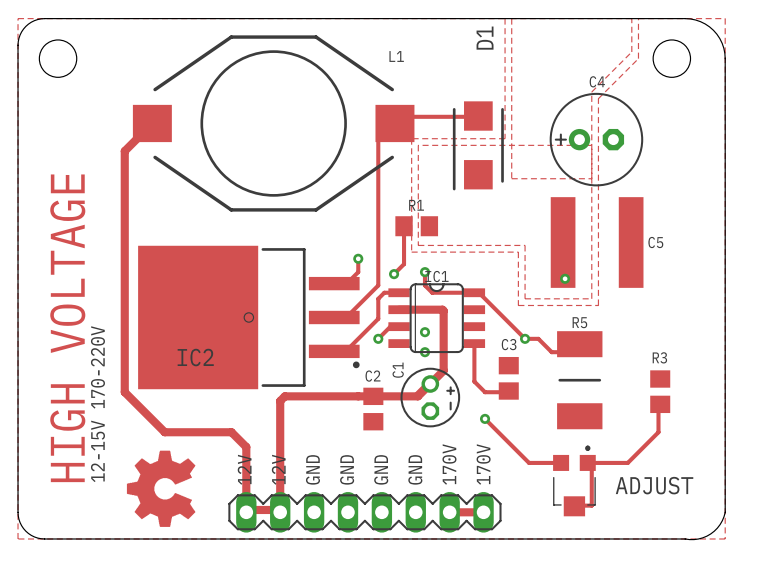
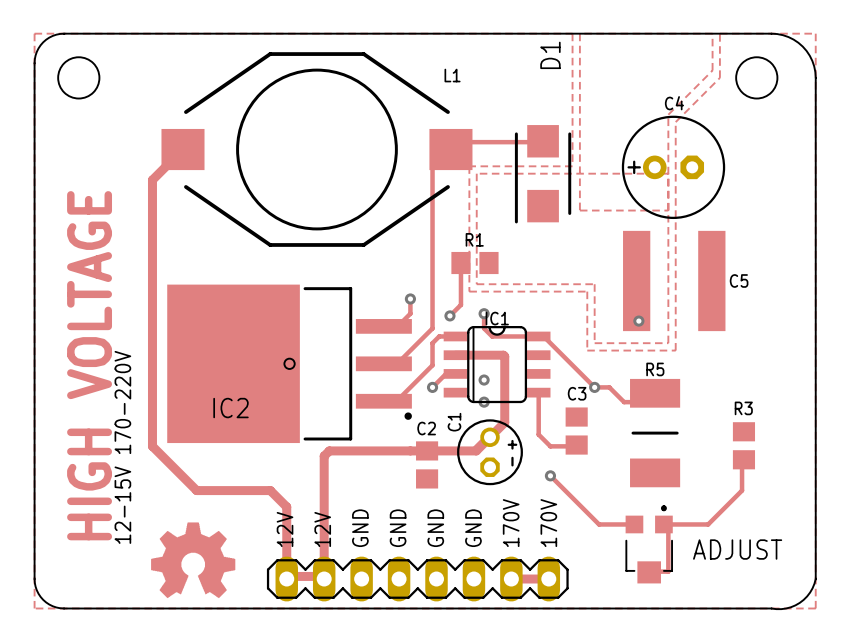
drawing: [126, 450, 196, 527] -> none
drawing: none -> [151, 522, 236, 599]

